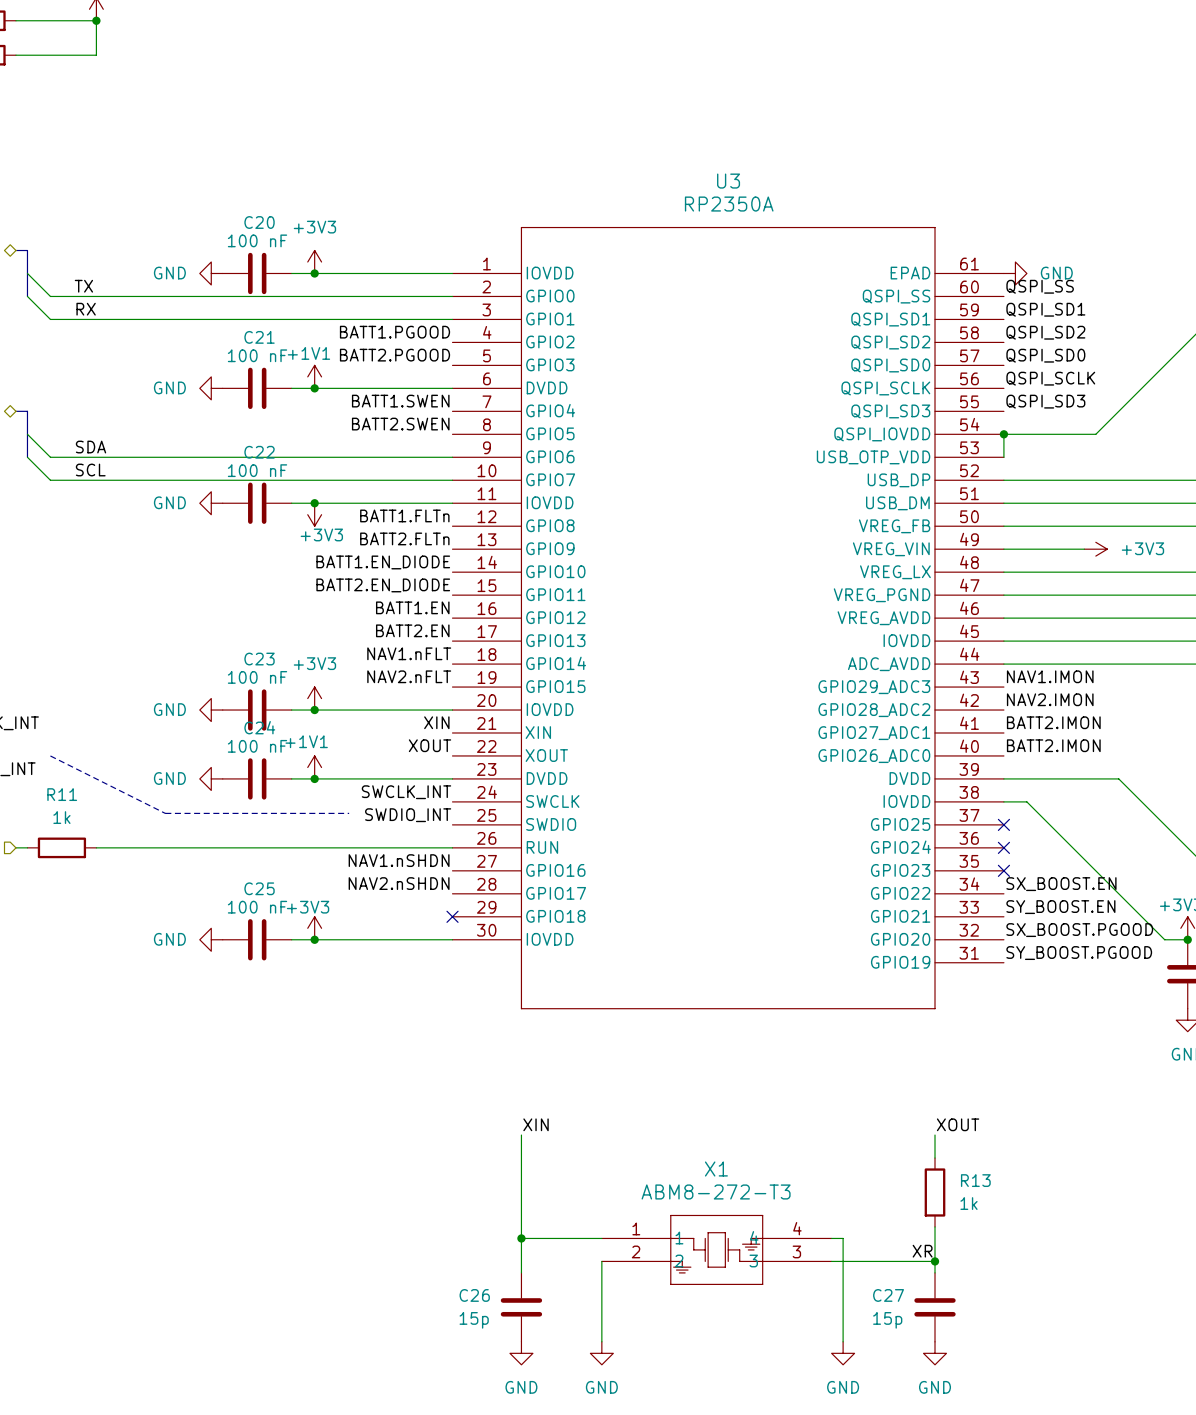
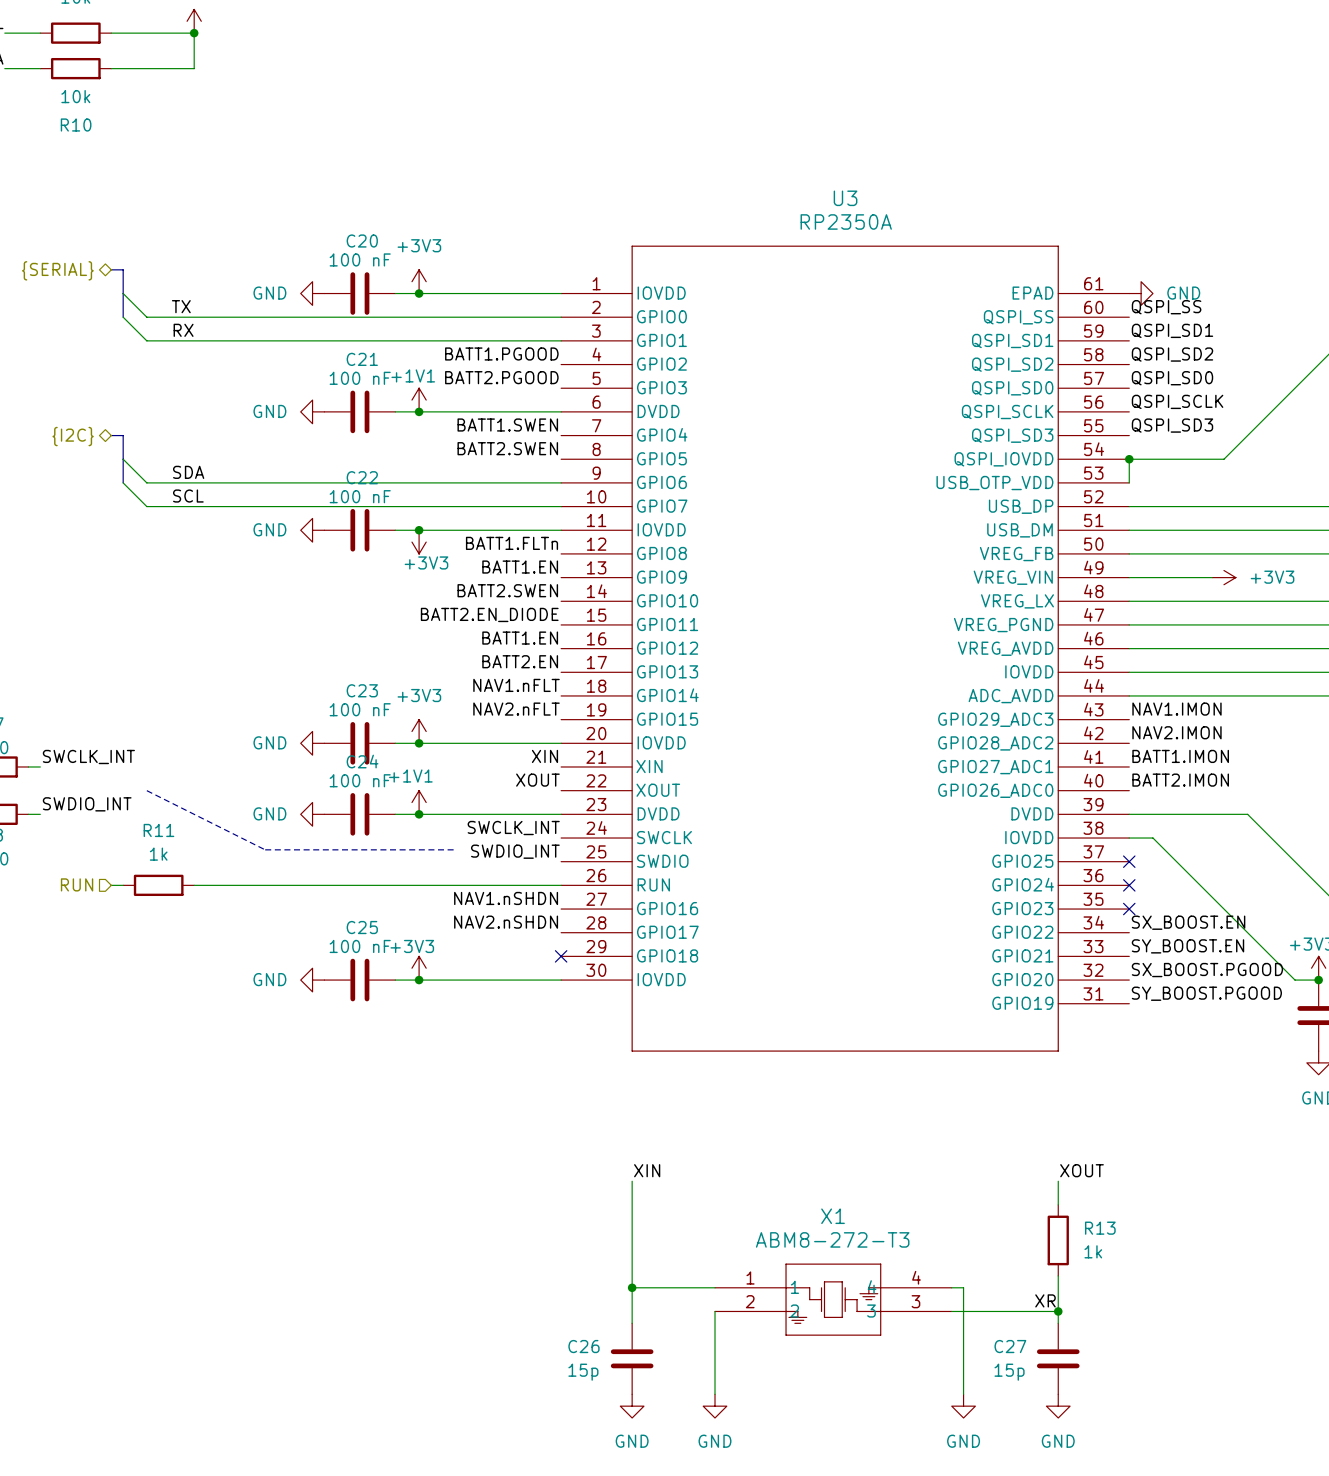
label: BATT2.FLTn (404, 538) -> BATT1.EN (520, 567)
label: BATT1.EN_DIODE (383, 562) -> BATT2.SWEN (507, 590)
label: BATT2.IMON (1053, 722) -> BATT1.IMON (1180, 756)

